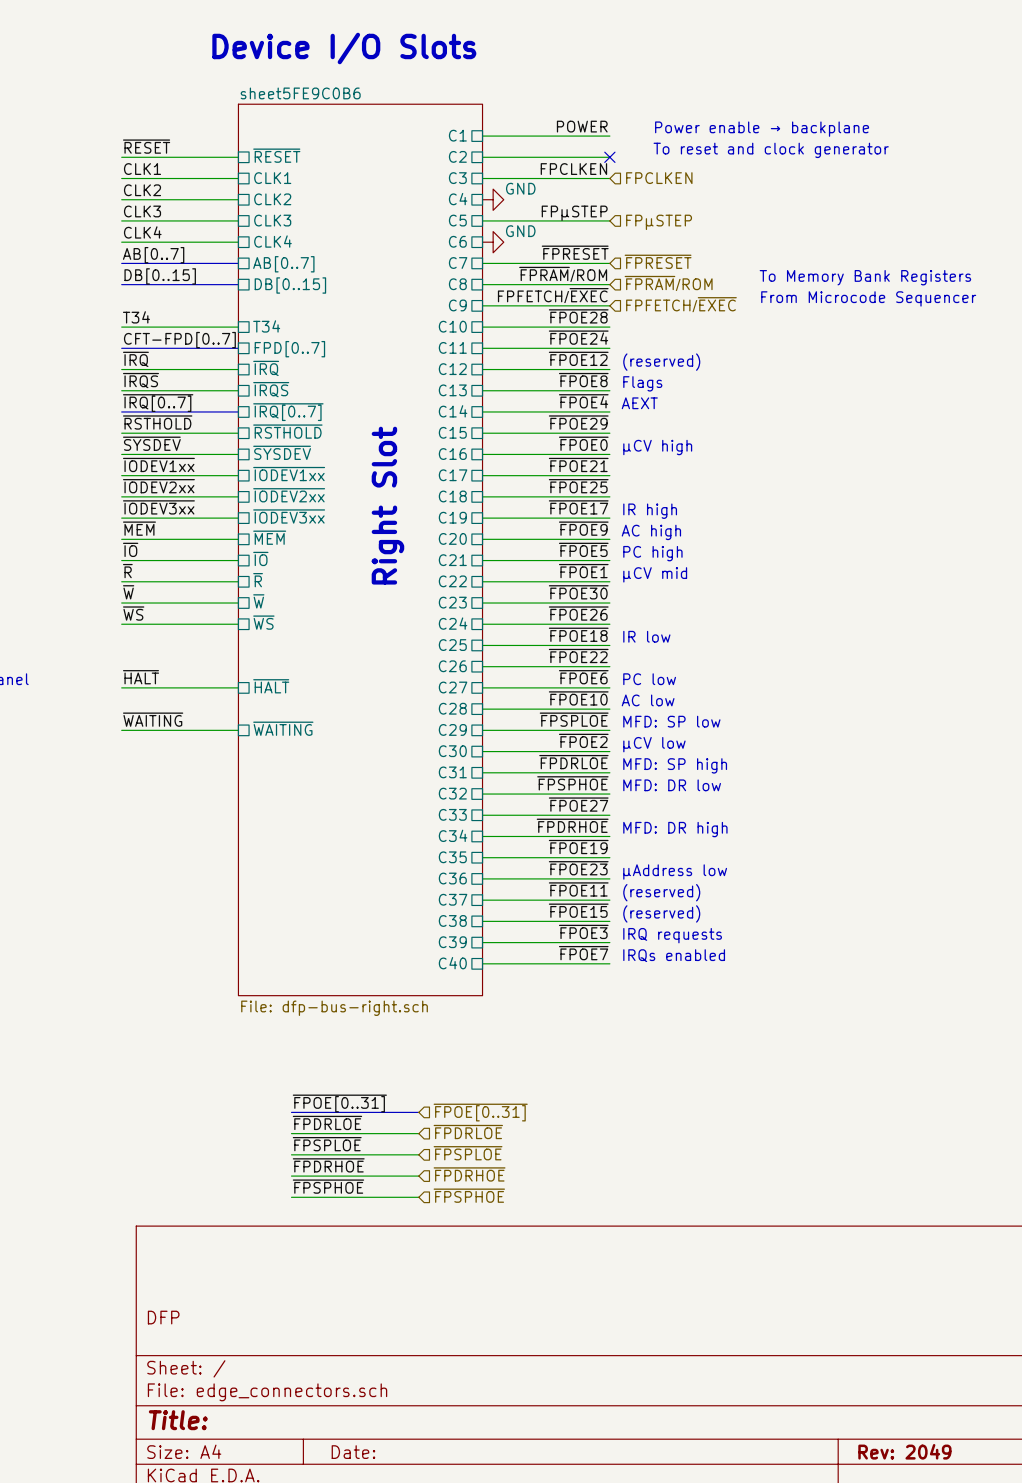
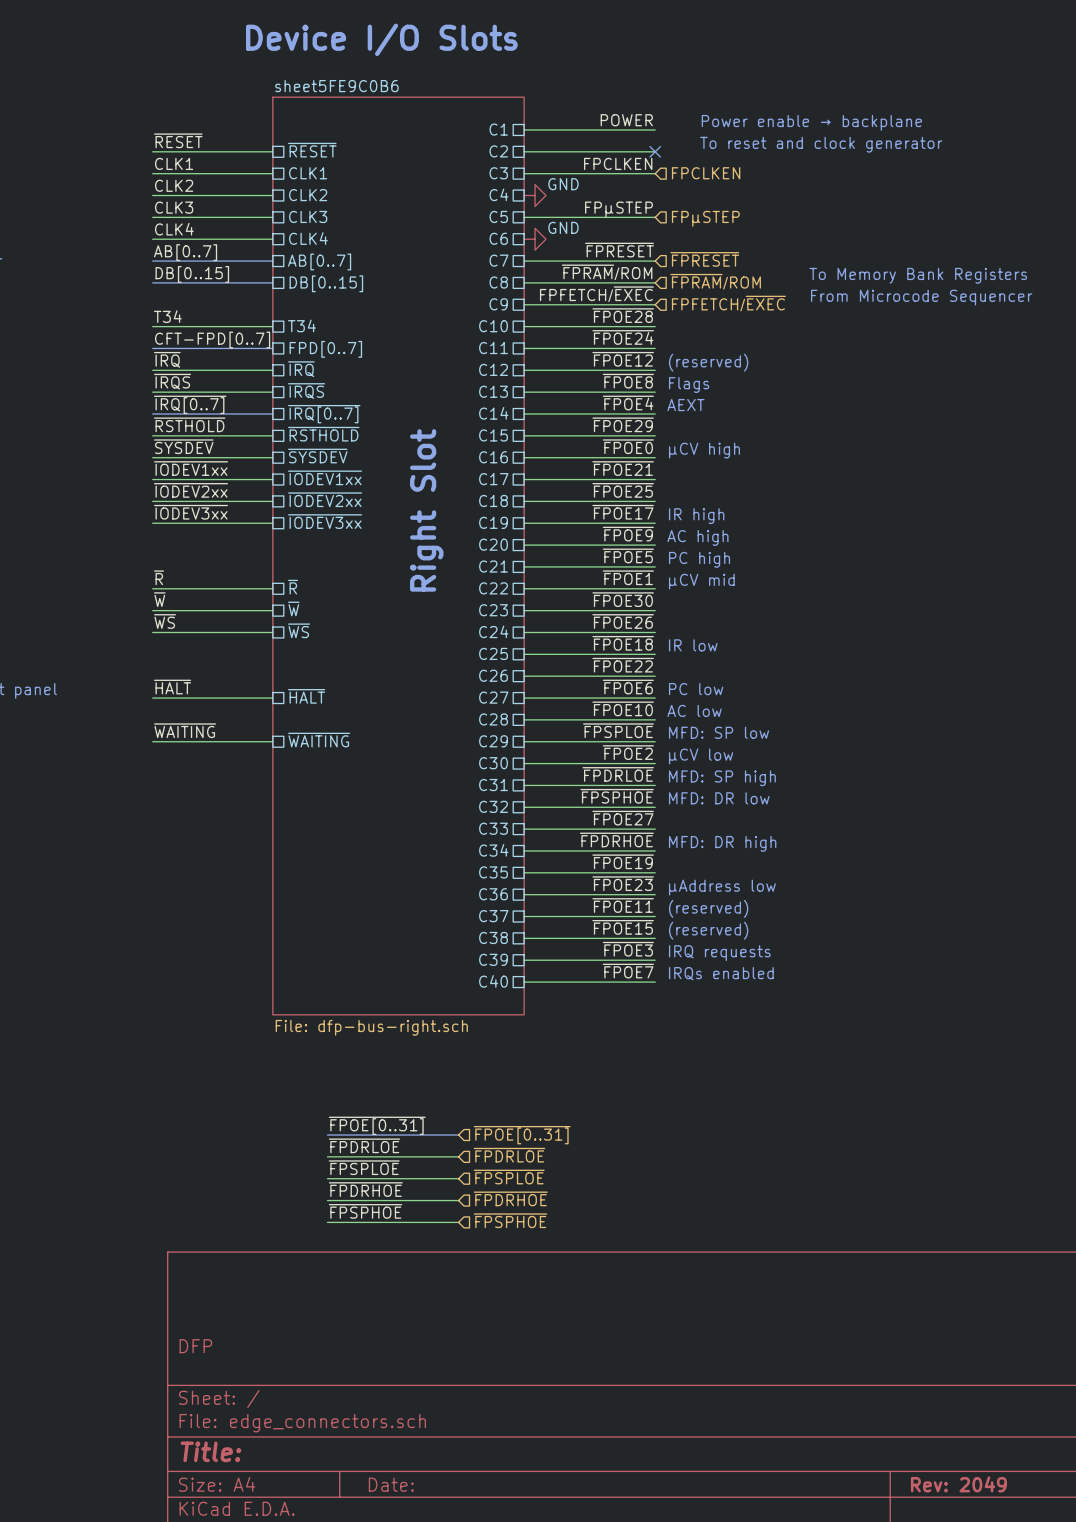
label: ~{MEM} (139, 528) -> none
sheet pin: ~{MEM} (269, 537) -> none
wire: (121, 539) (238, 539) -> none
label: ~{IO} (130, 549) -> none
sheet pin: ~{IO} (260, 558) -> none
wire: (121, 560) (238, 560) -> none

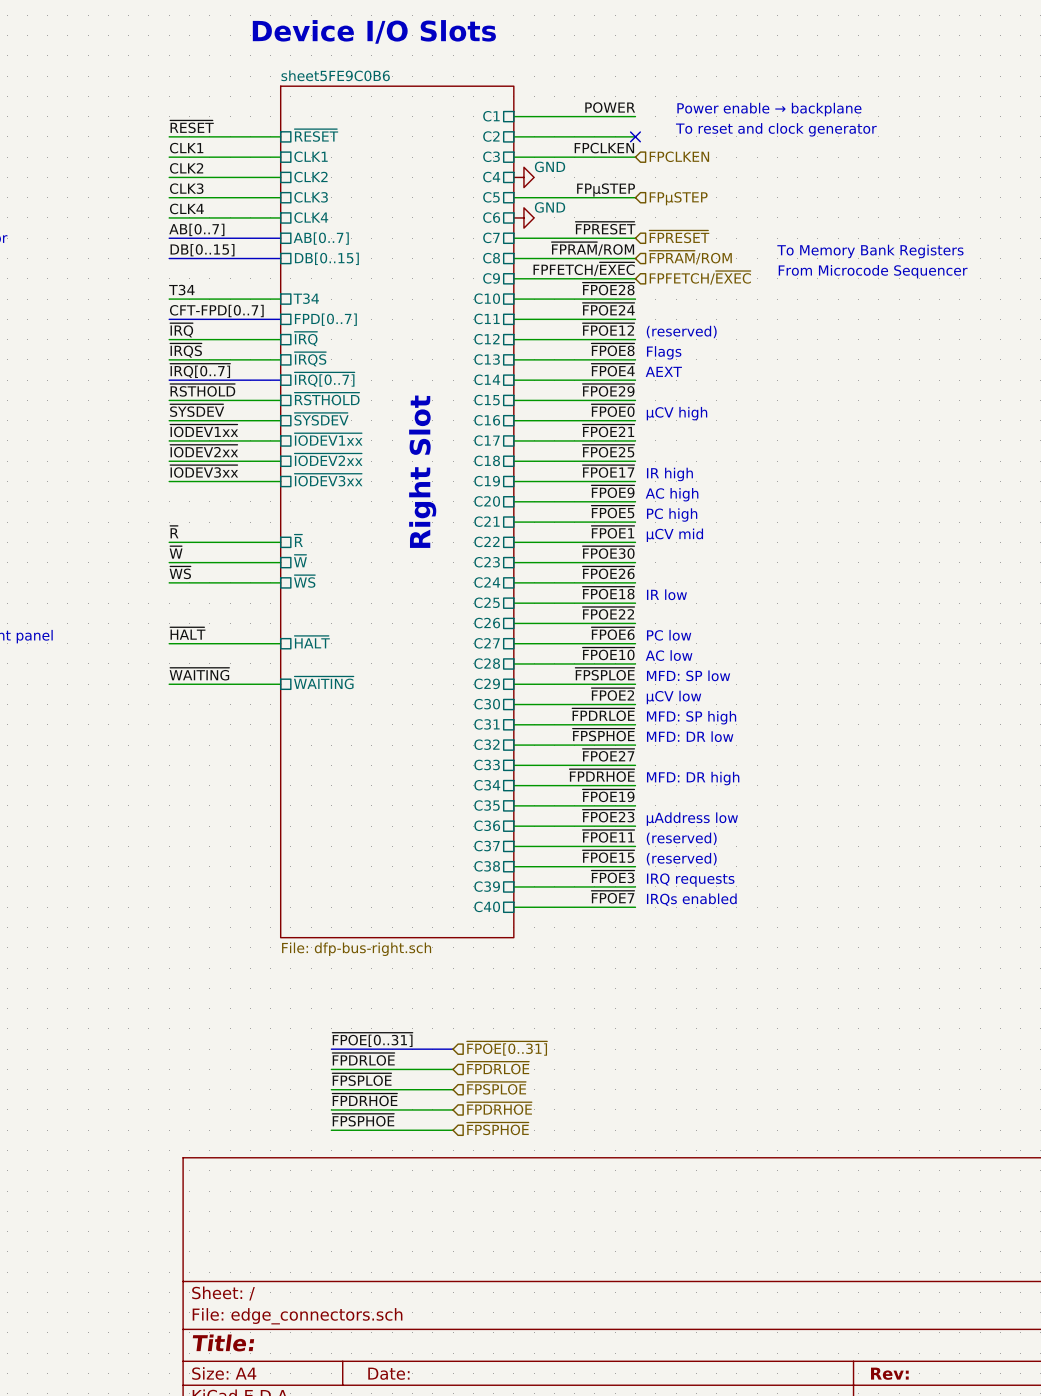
title block: DFP (195, 1346) -> none
title block: Rev: 2049 (958, 1484) -> Rev: (889, 1373)

